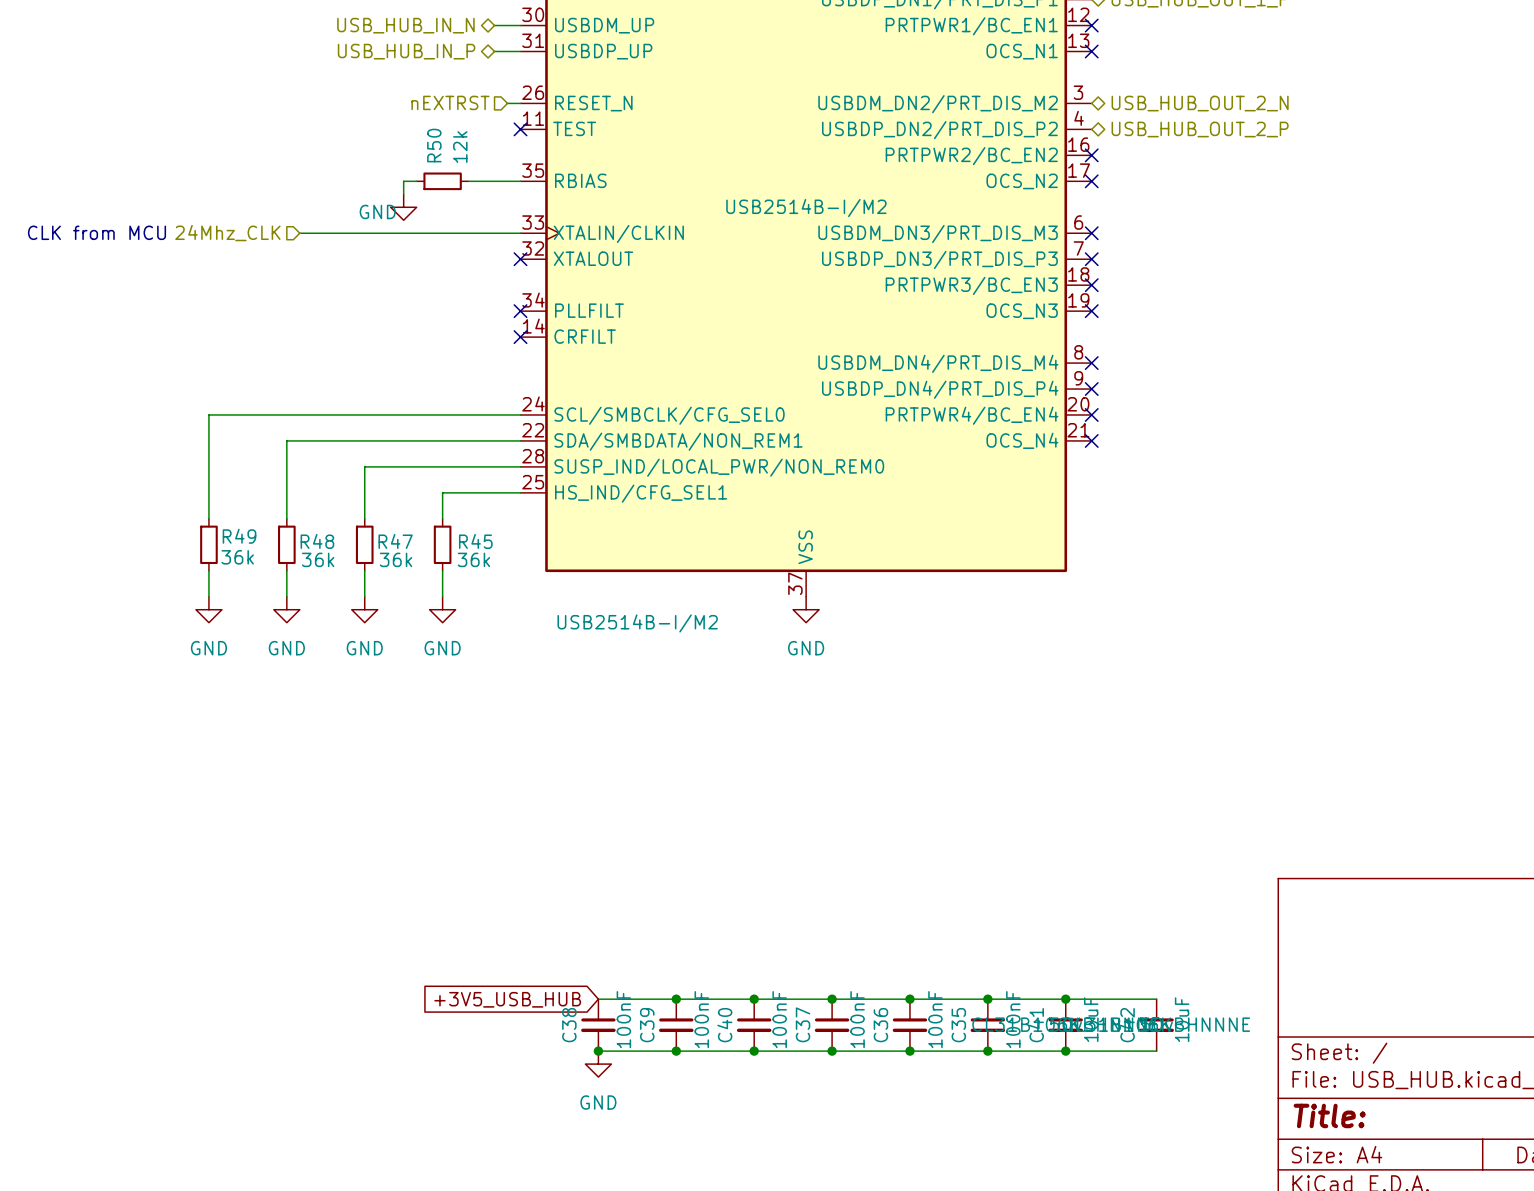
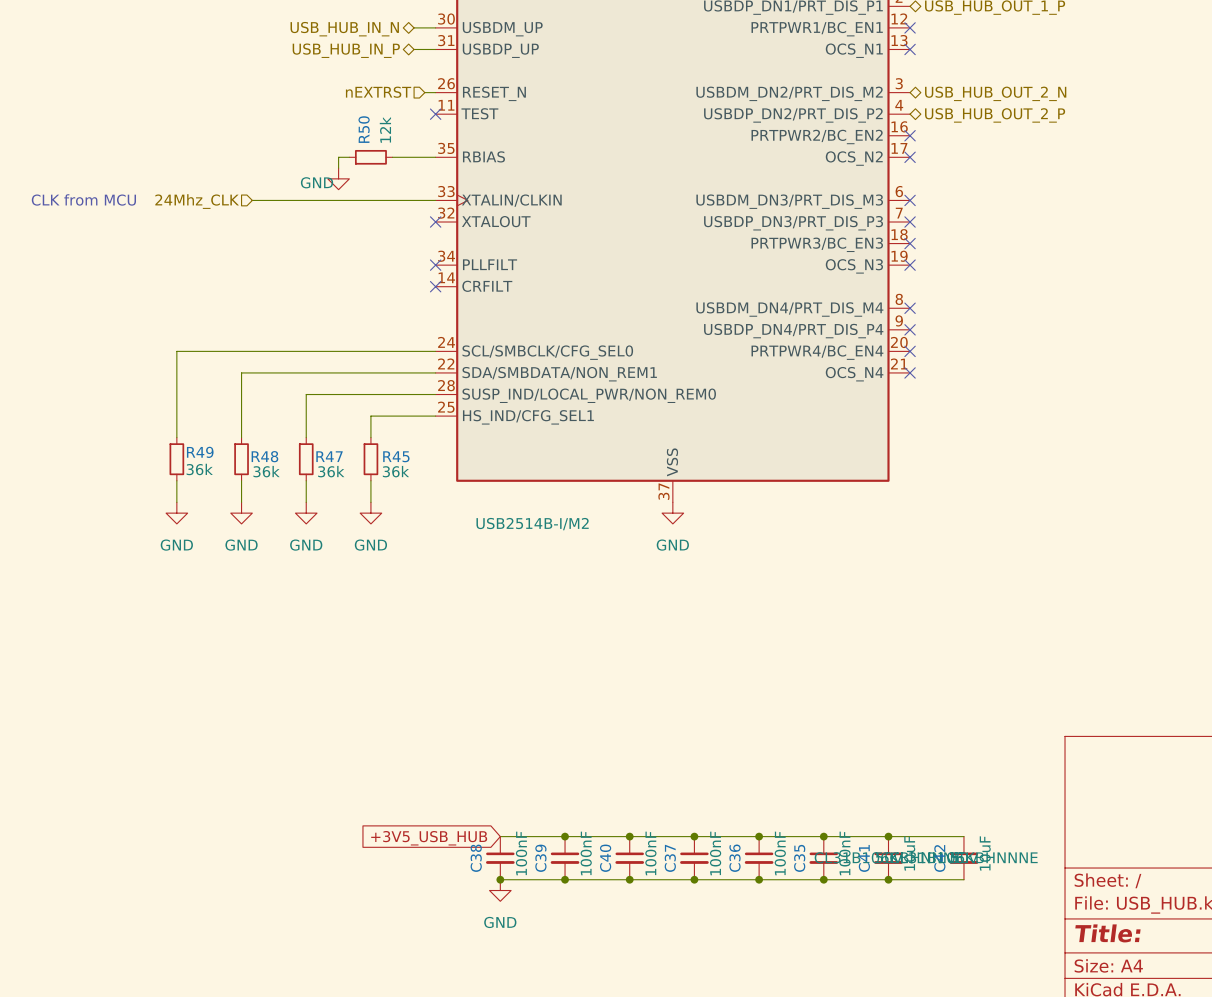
part text: USB2514B-I/M2 (806, 208) -> none

